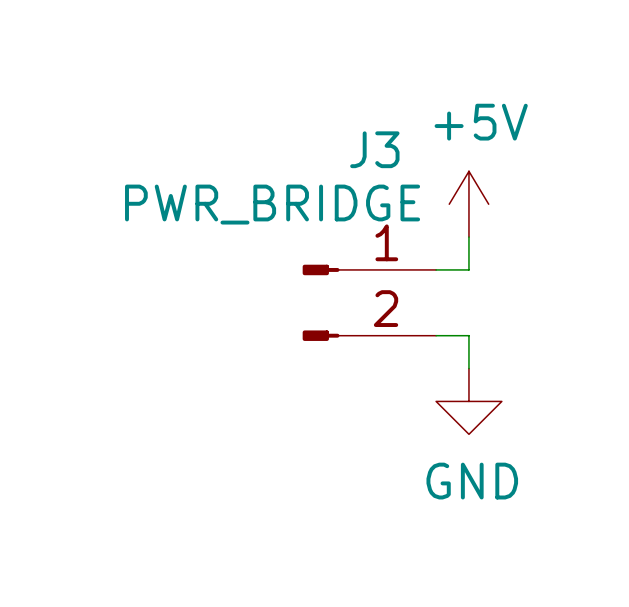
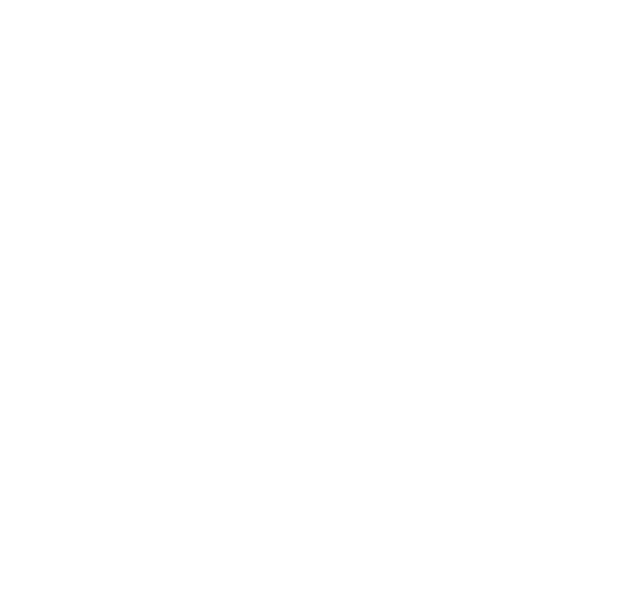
power symbol: +5V (468, 204) -> none
wire: (468, 237) (468, 269) (436, 269) -> none
J3: PWR_BRIDGE (369, 302) -> none
wire: (436, 335) (468, 335) (468, 368) -> none
power symbol: GND (468, 401) -> none

